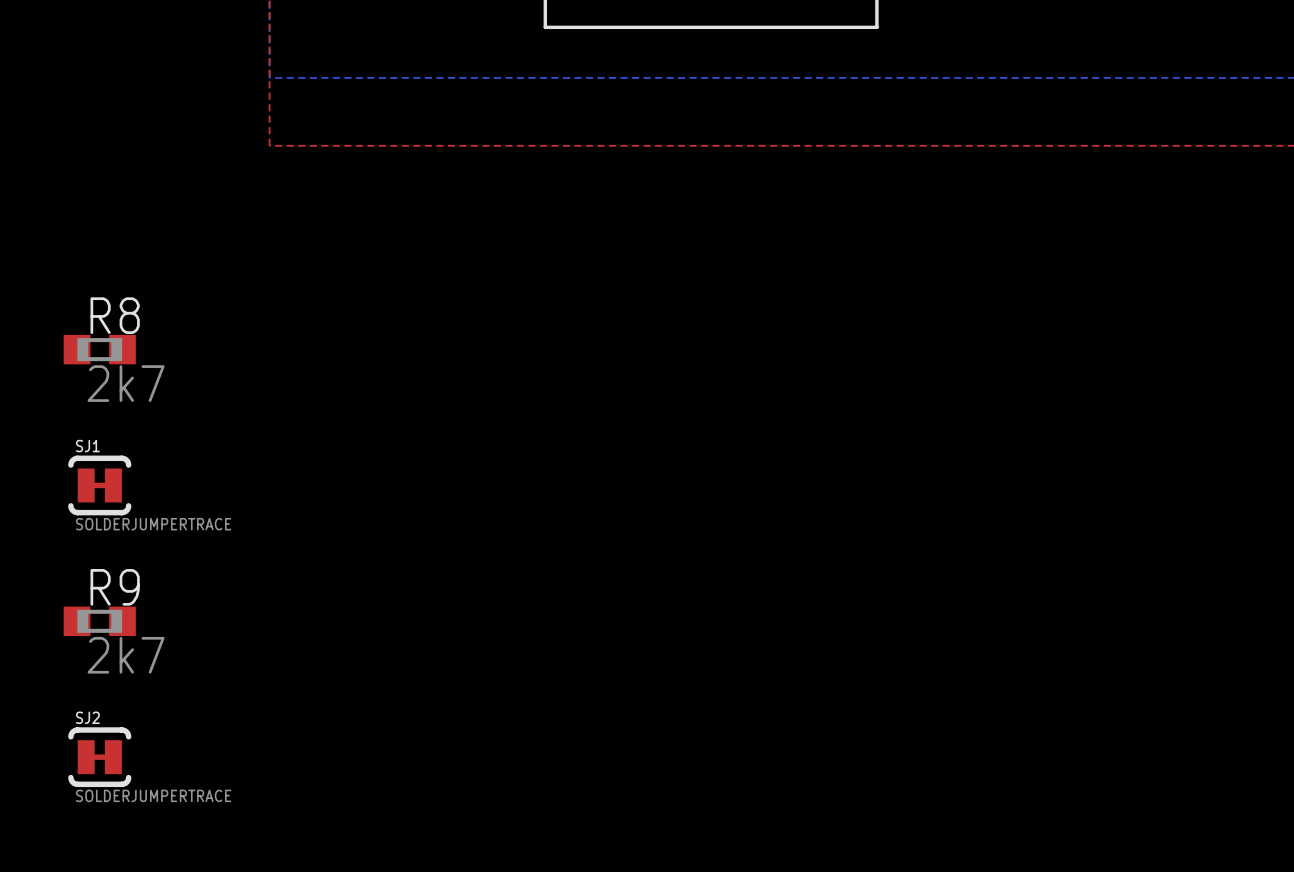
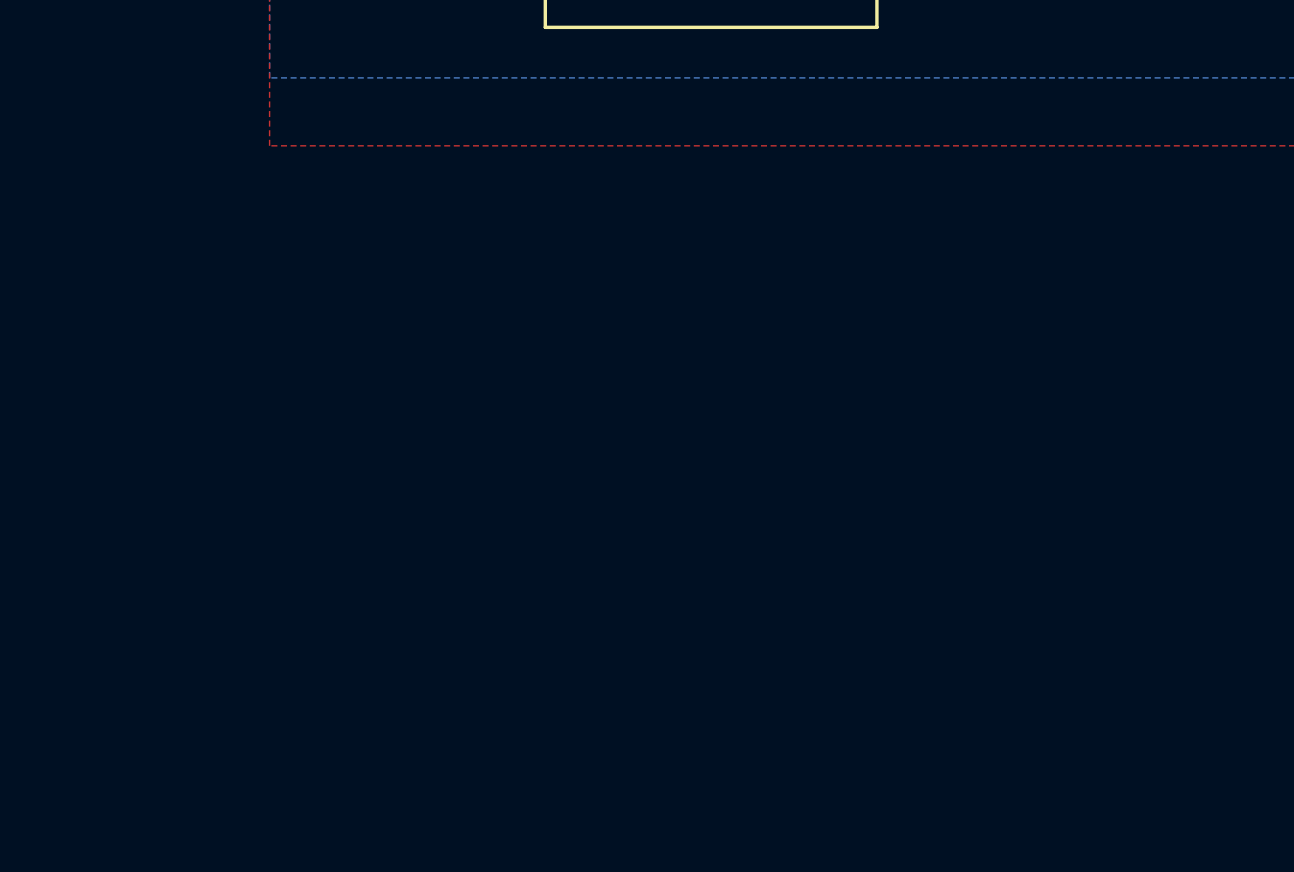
R8: 2k7 (99, 349) -> none
SJ1: SOLDERJUMPERTRACE (99, 485) -> none
R9: 2k7 (99, 621) -> none
SJ2: SOLDERJUMPERTRACE (99, 757) -> none

